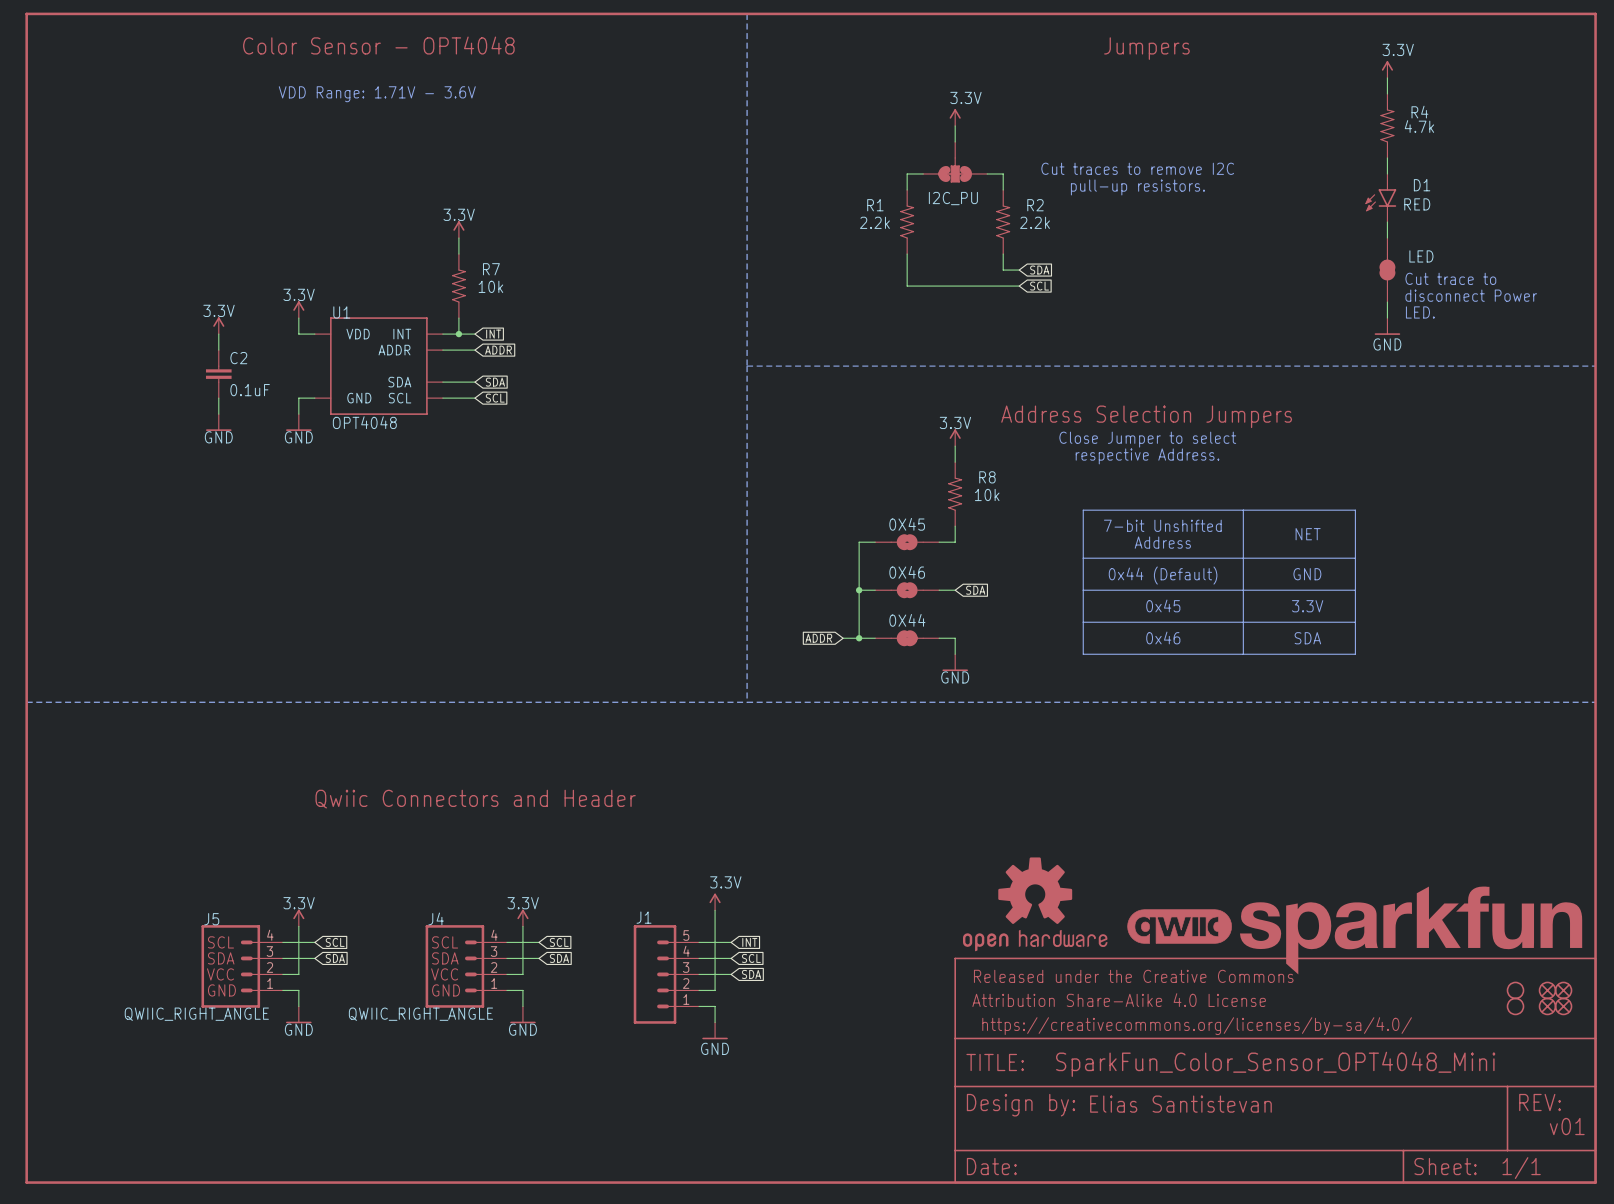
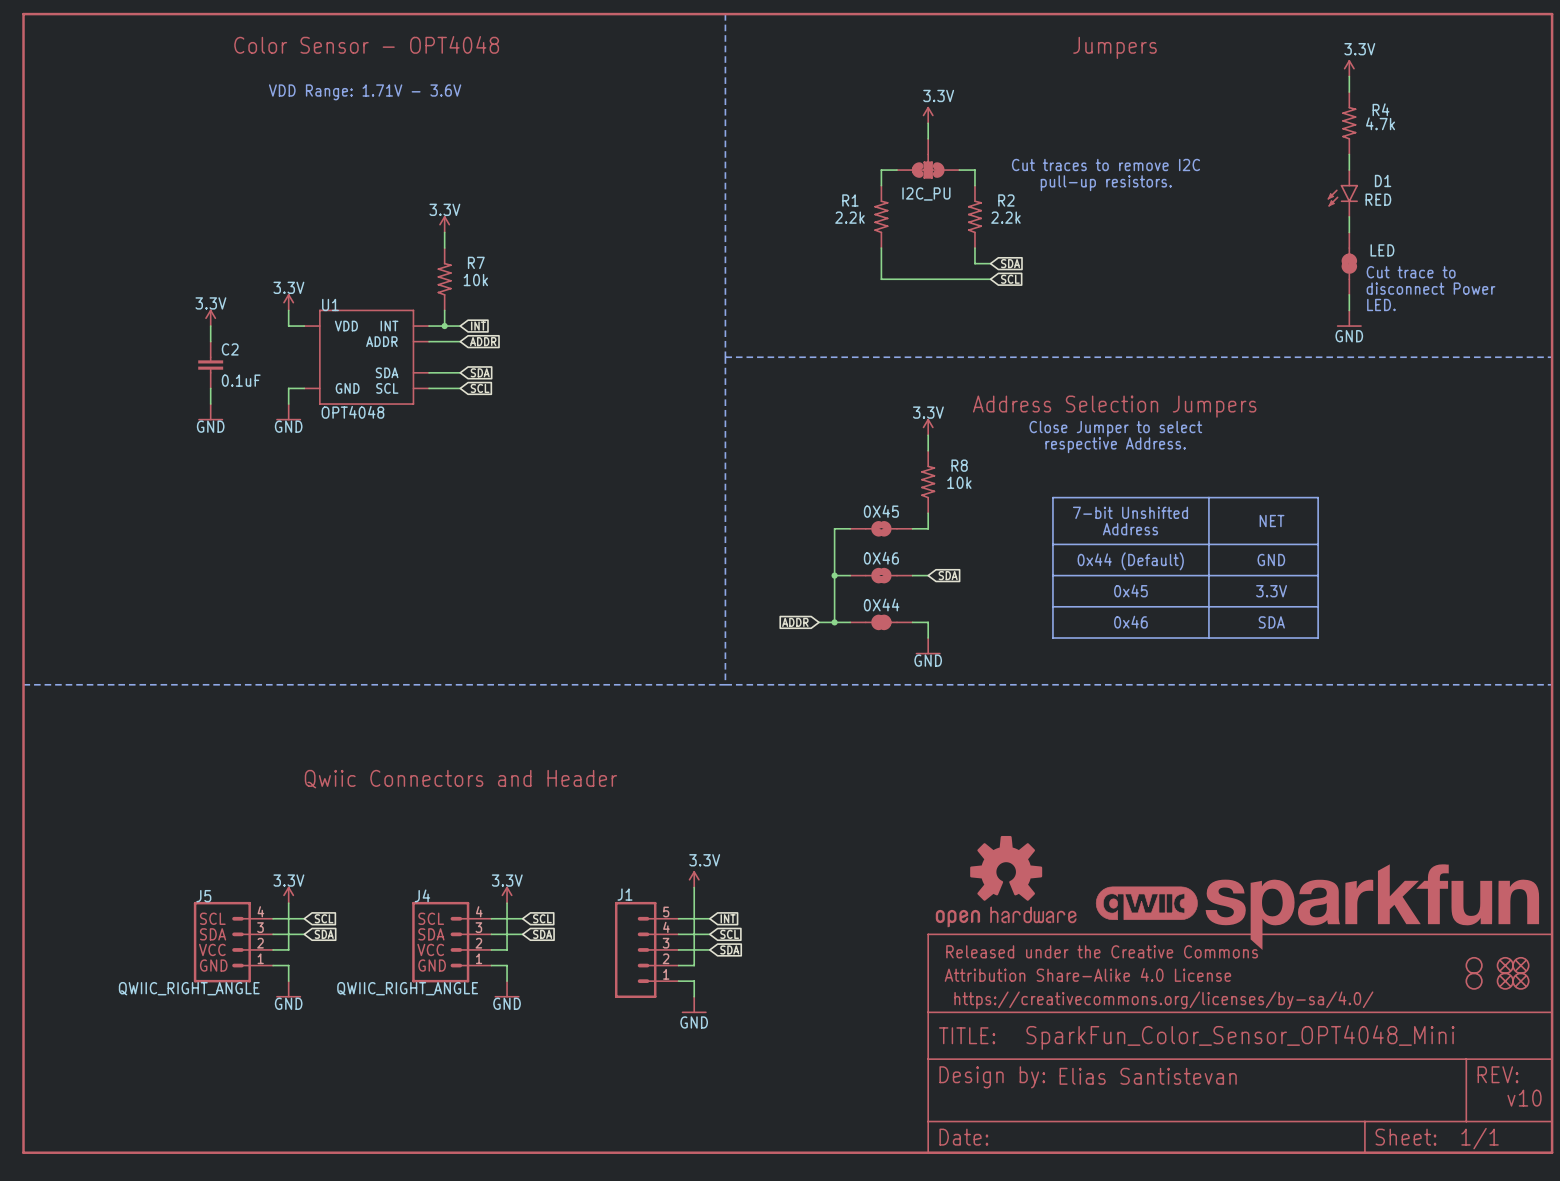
text: v01 (1567, 1126) -> v10 (1524, 1098)

